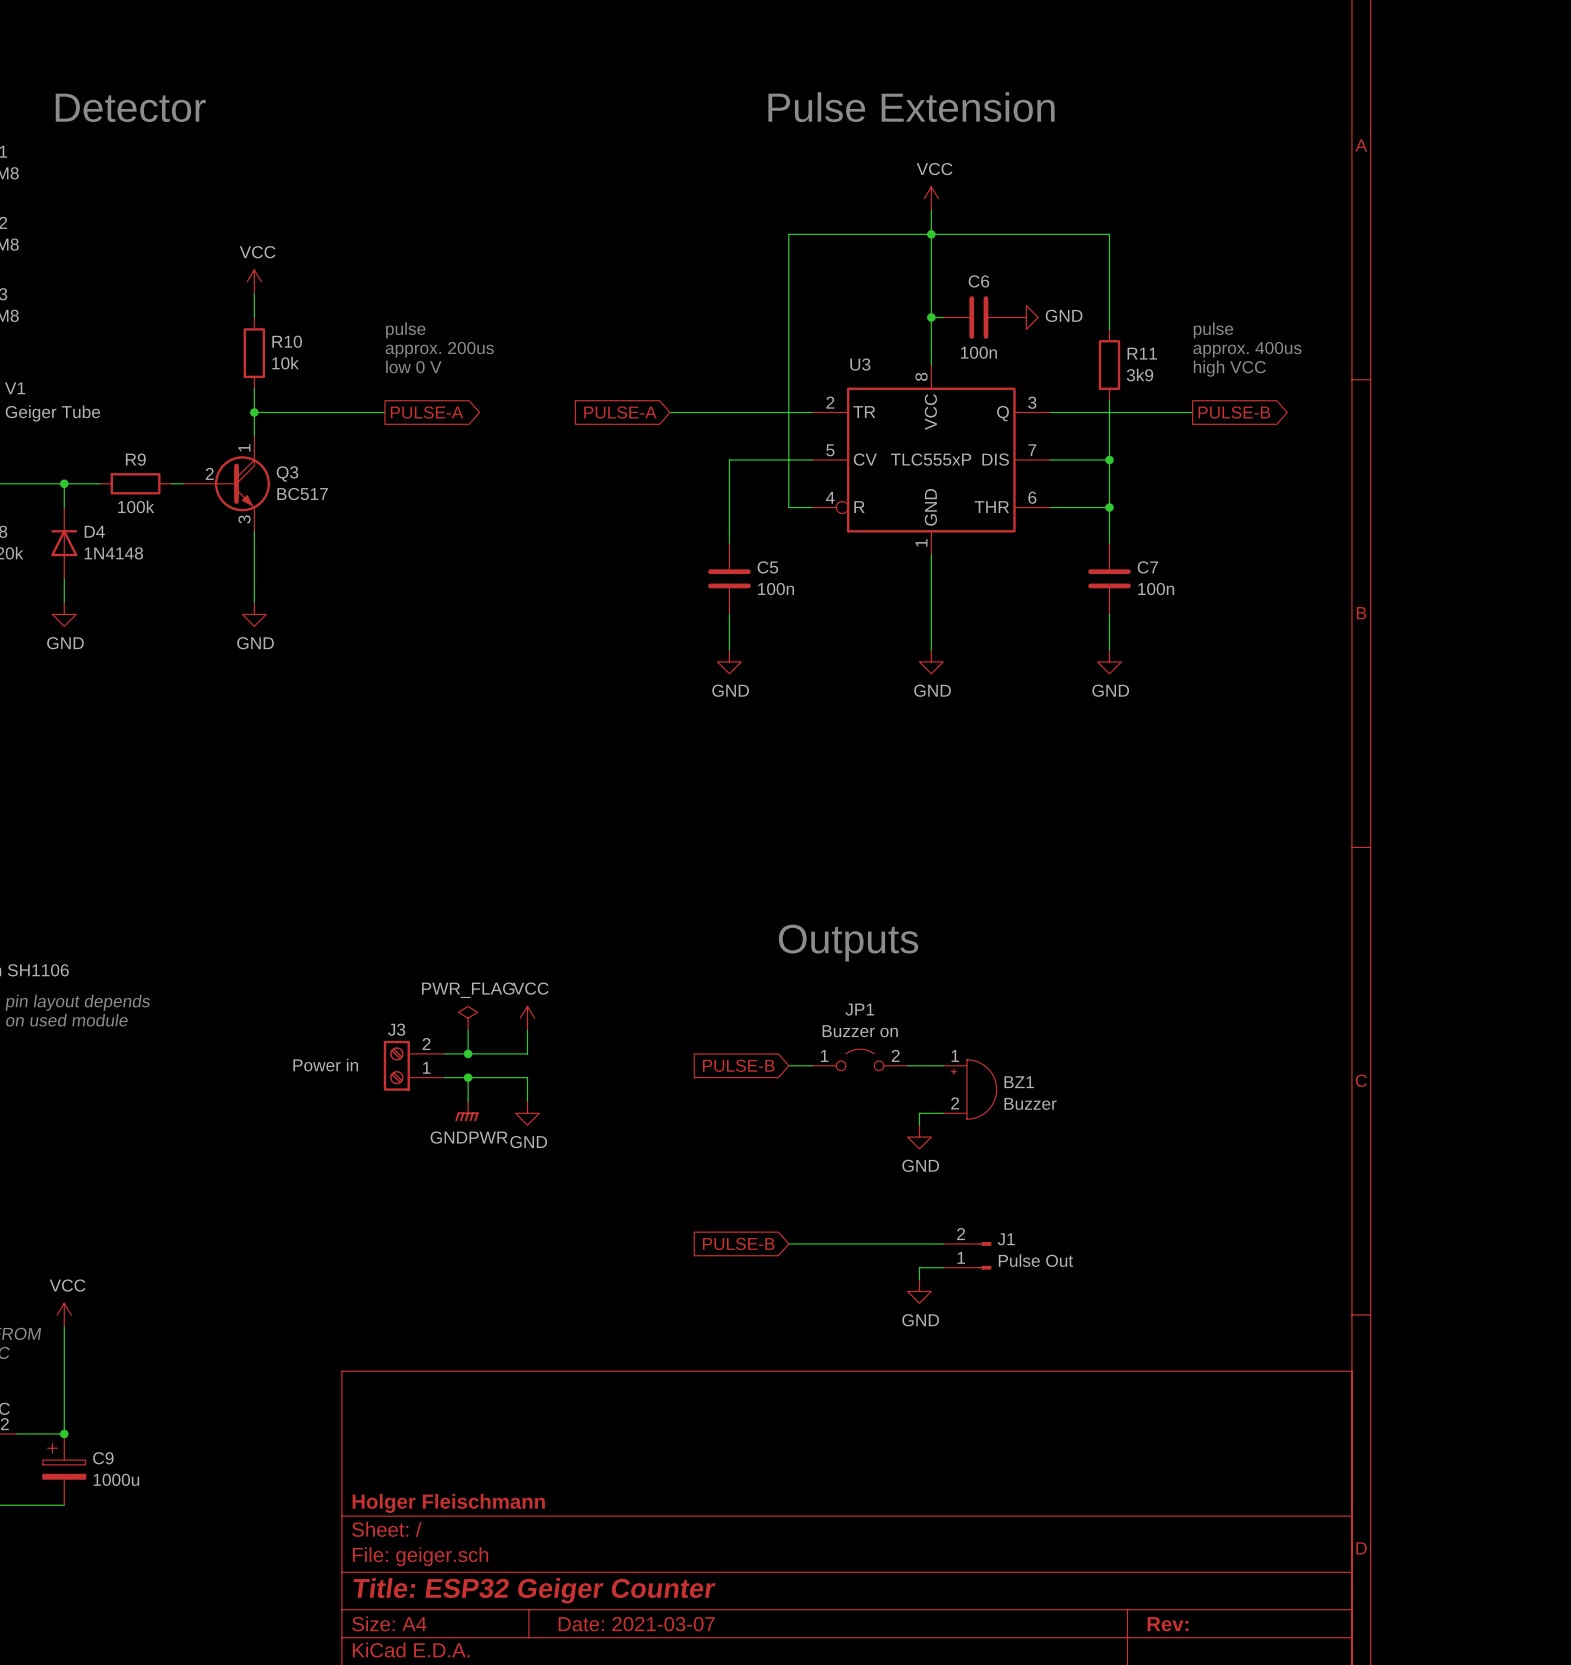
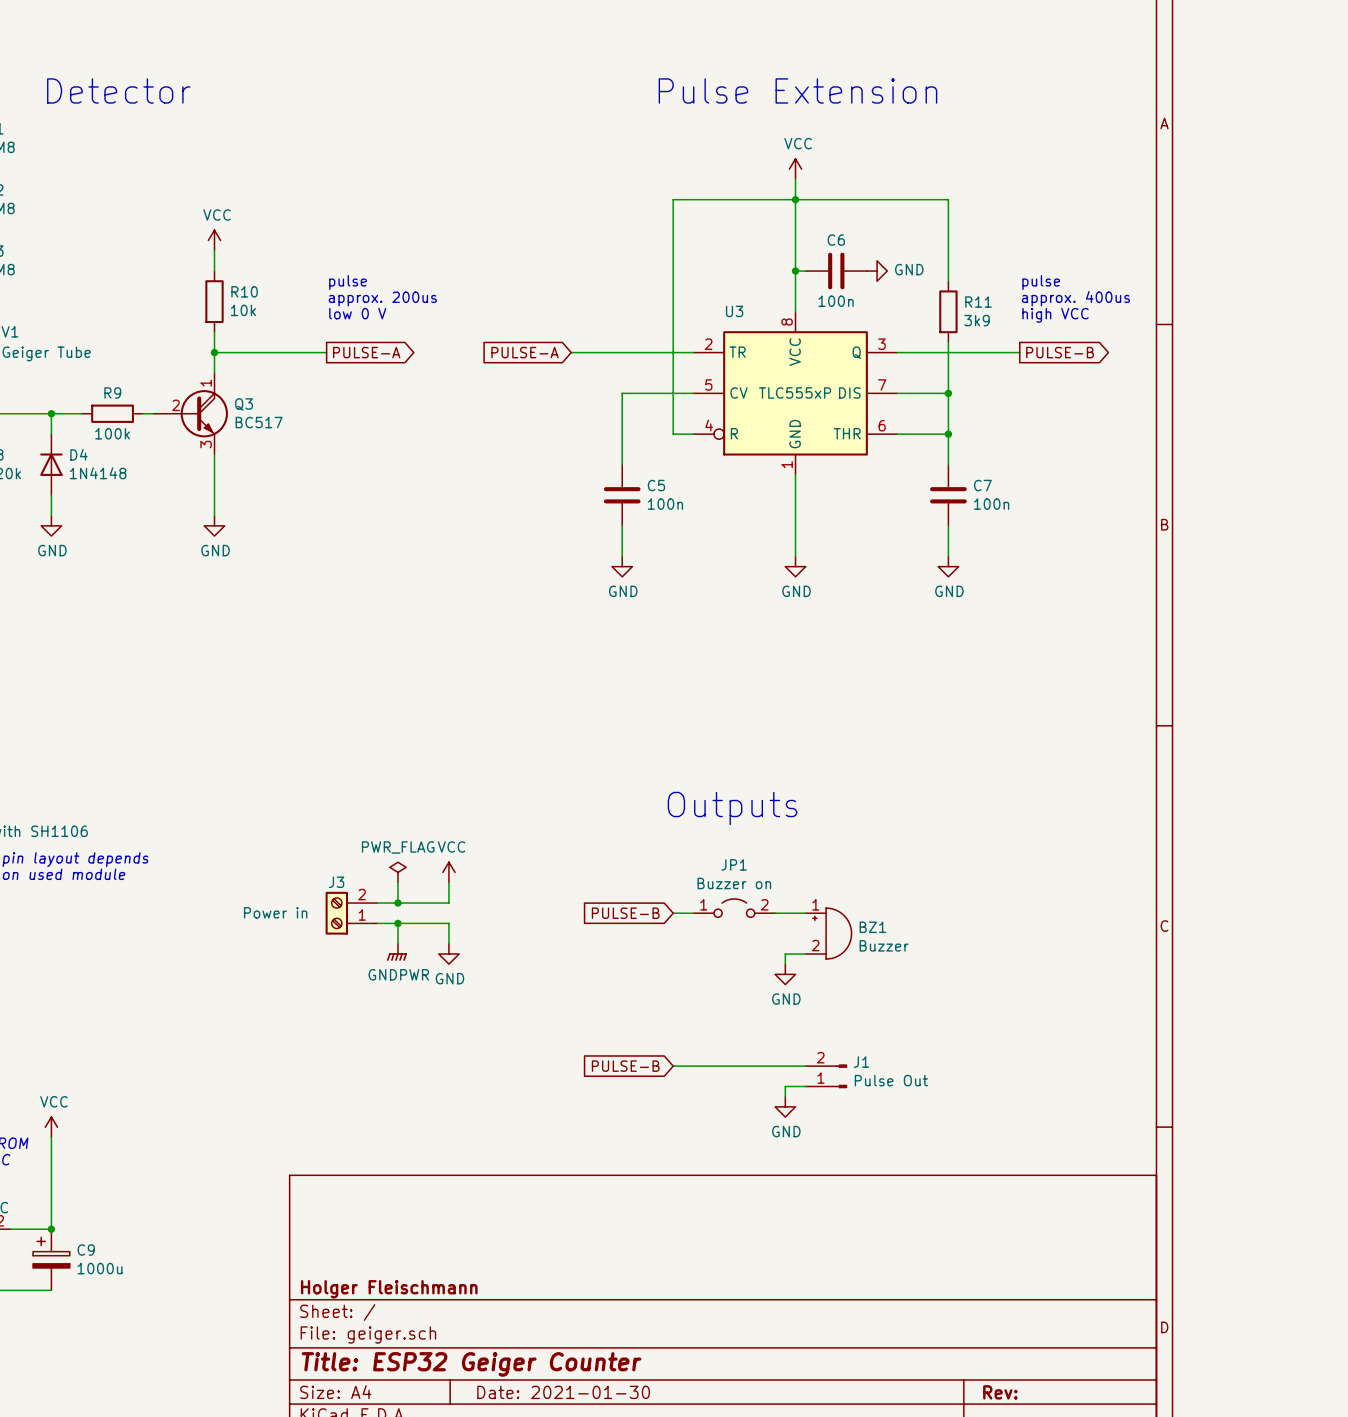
title block: Date: 2021-03-07 (636, 1624) -> Date: 2021-01-30 (563, 1392)

